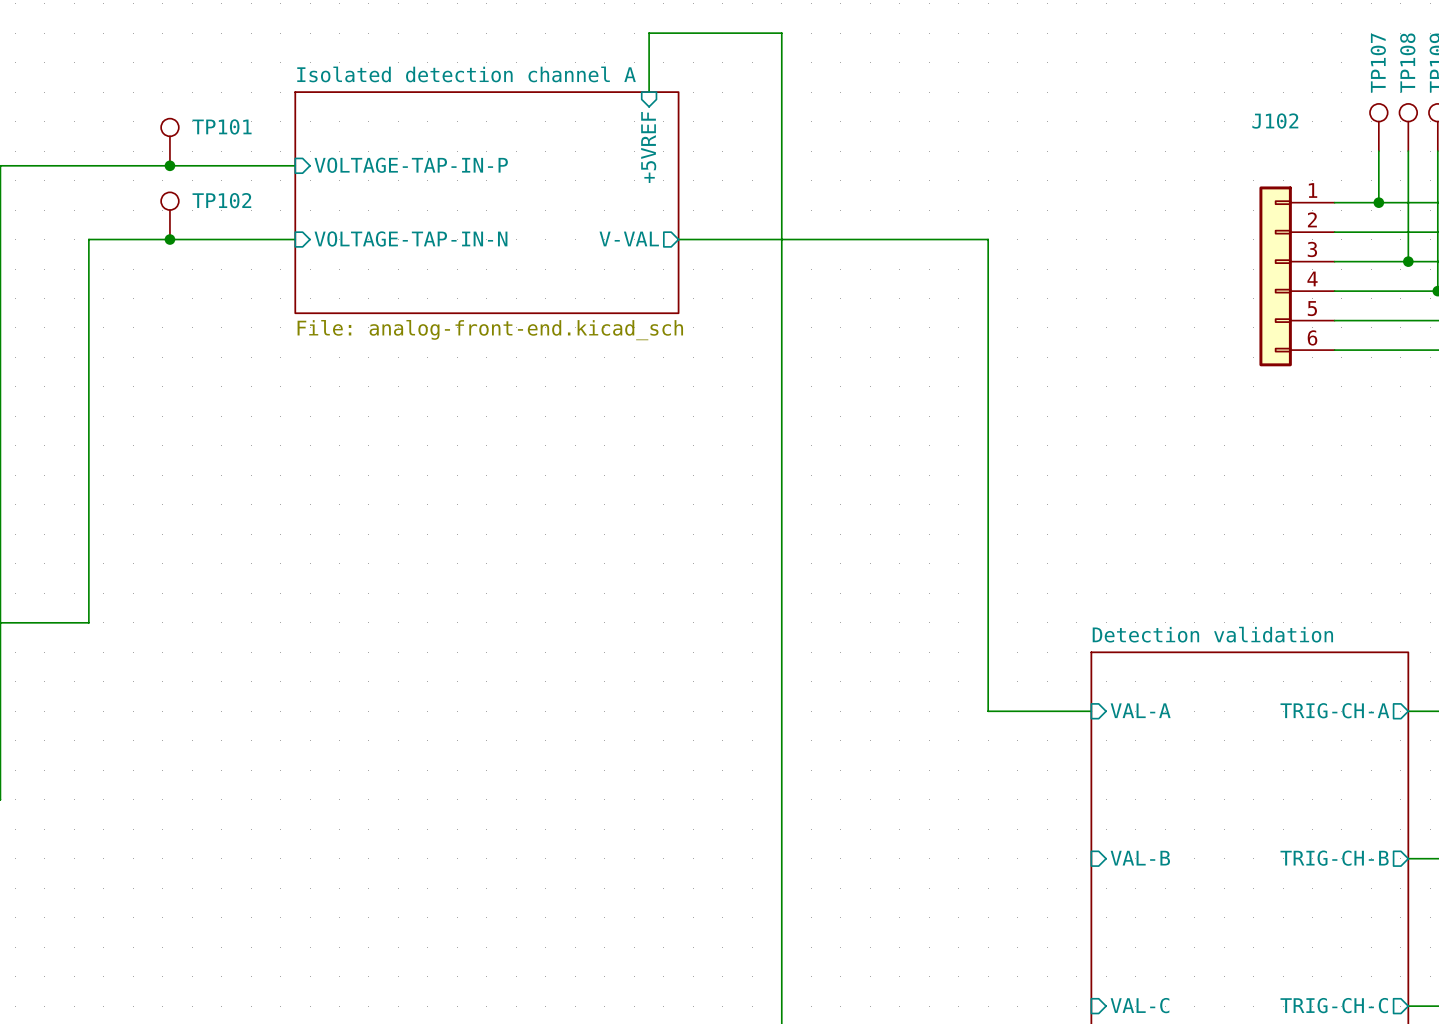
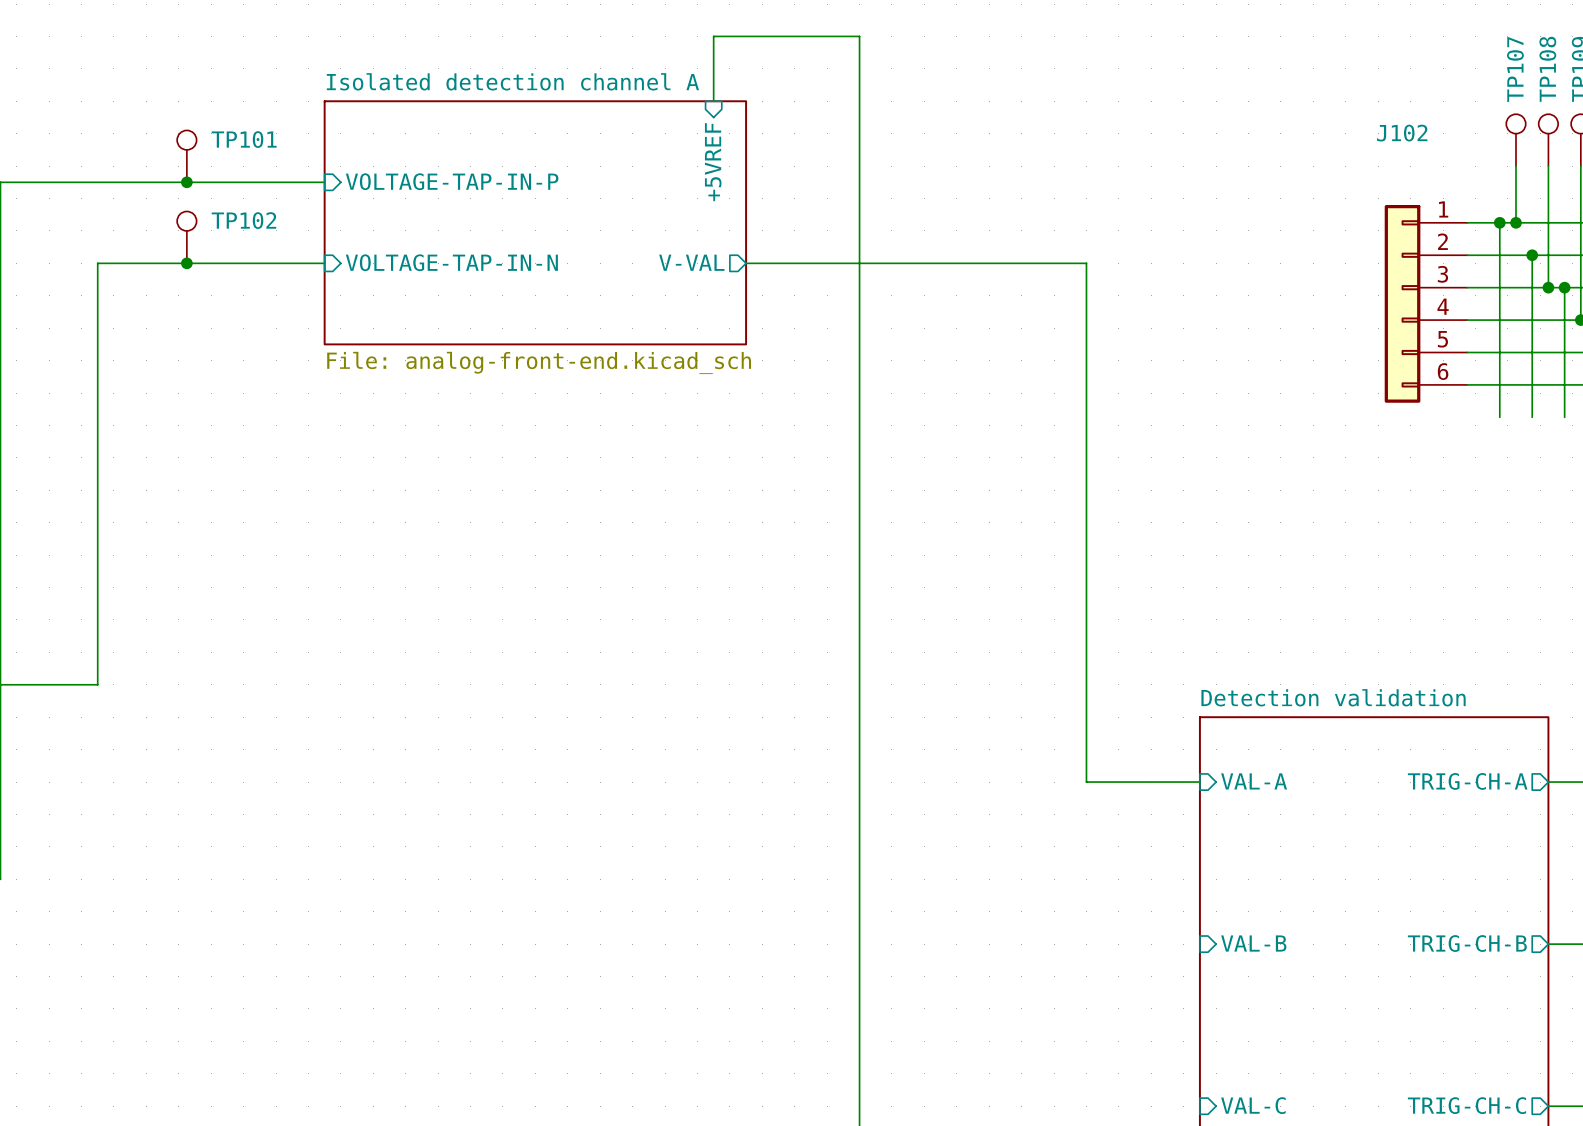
wire: none -> (1499, 222) (1499, 417)
junction: none -> (1499, 222)
wire: none -> (1532, 255) (1532, 417)
junction: none -> (1532, 255)
wire: none -> (1564, 287) (1564, 417)
junction: none -> (1564, 287)

